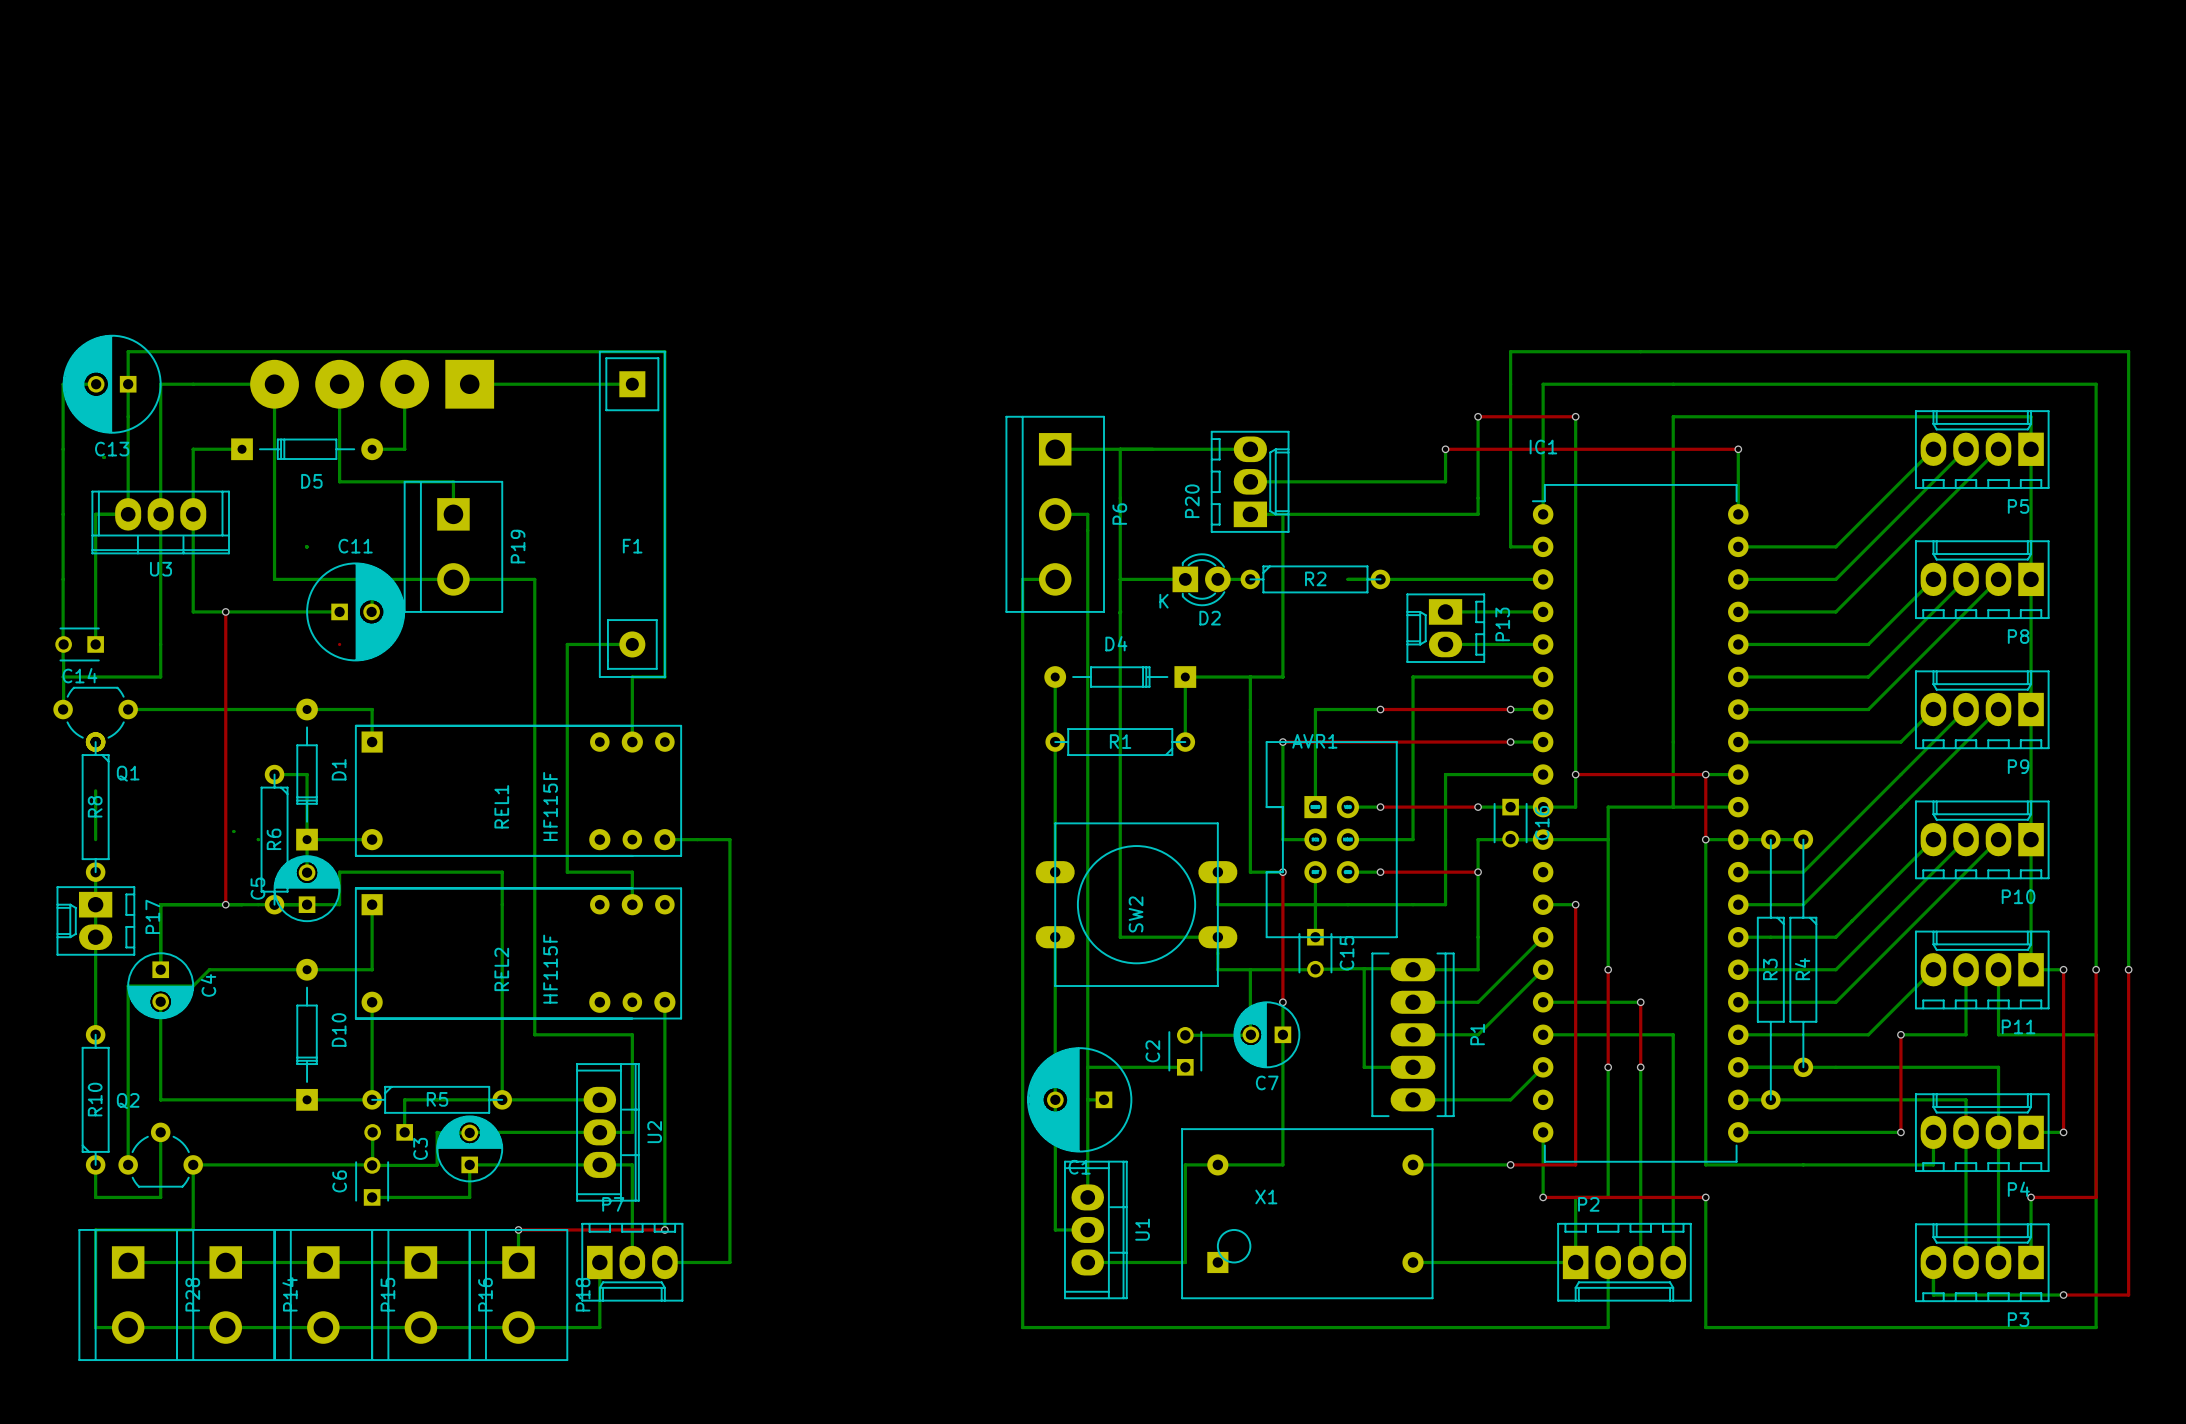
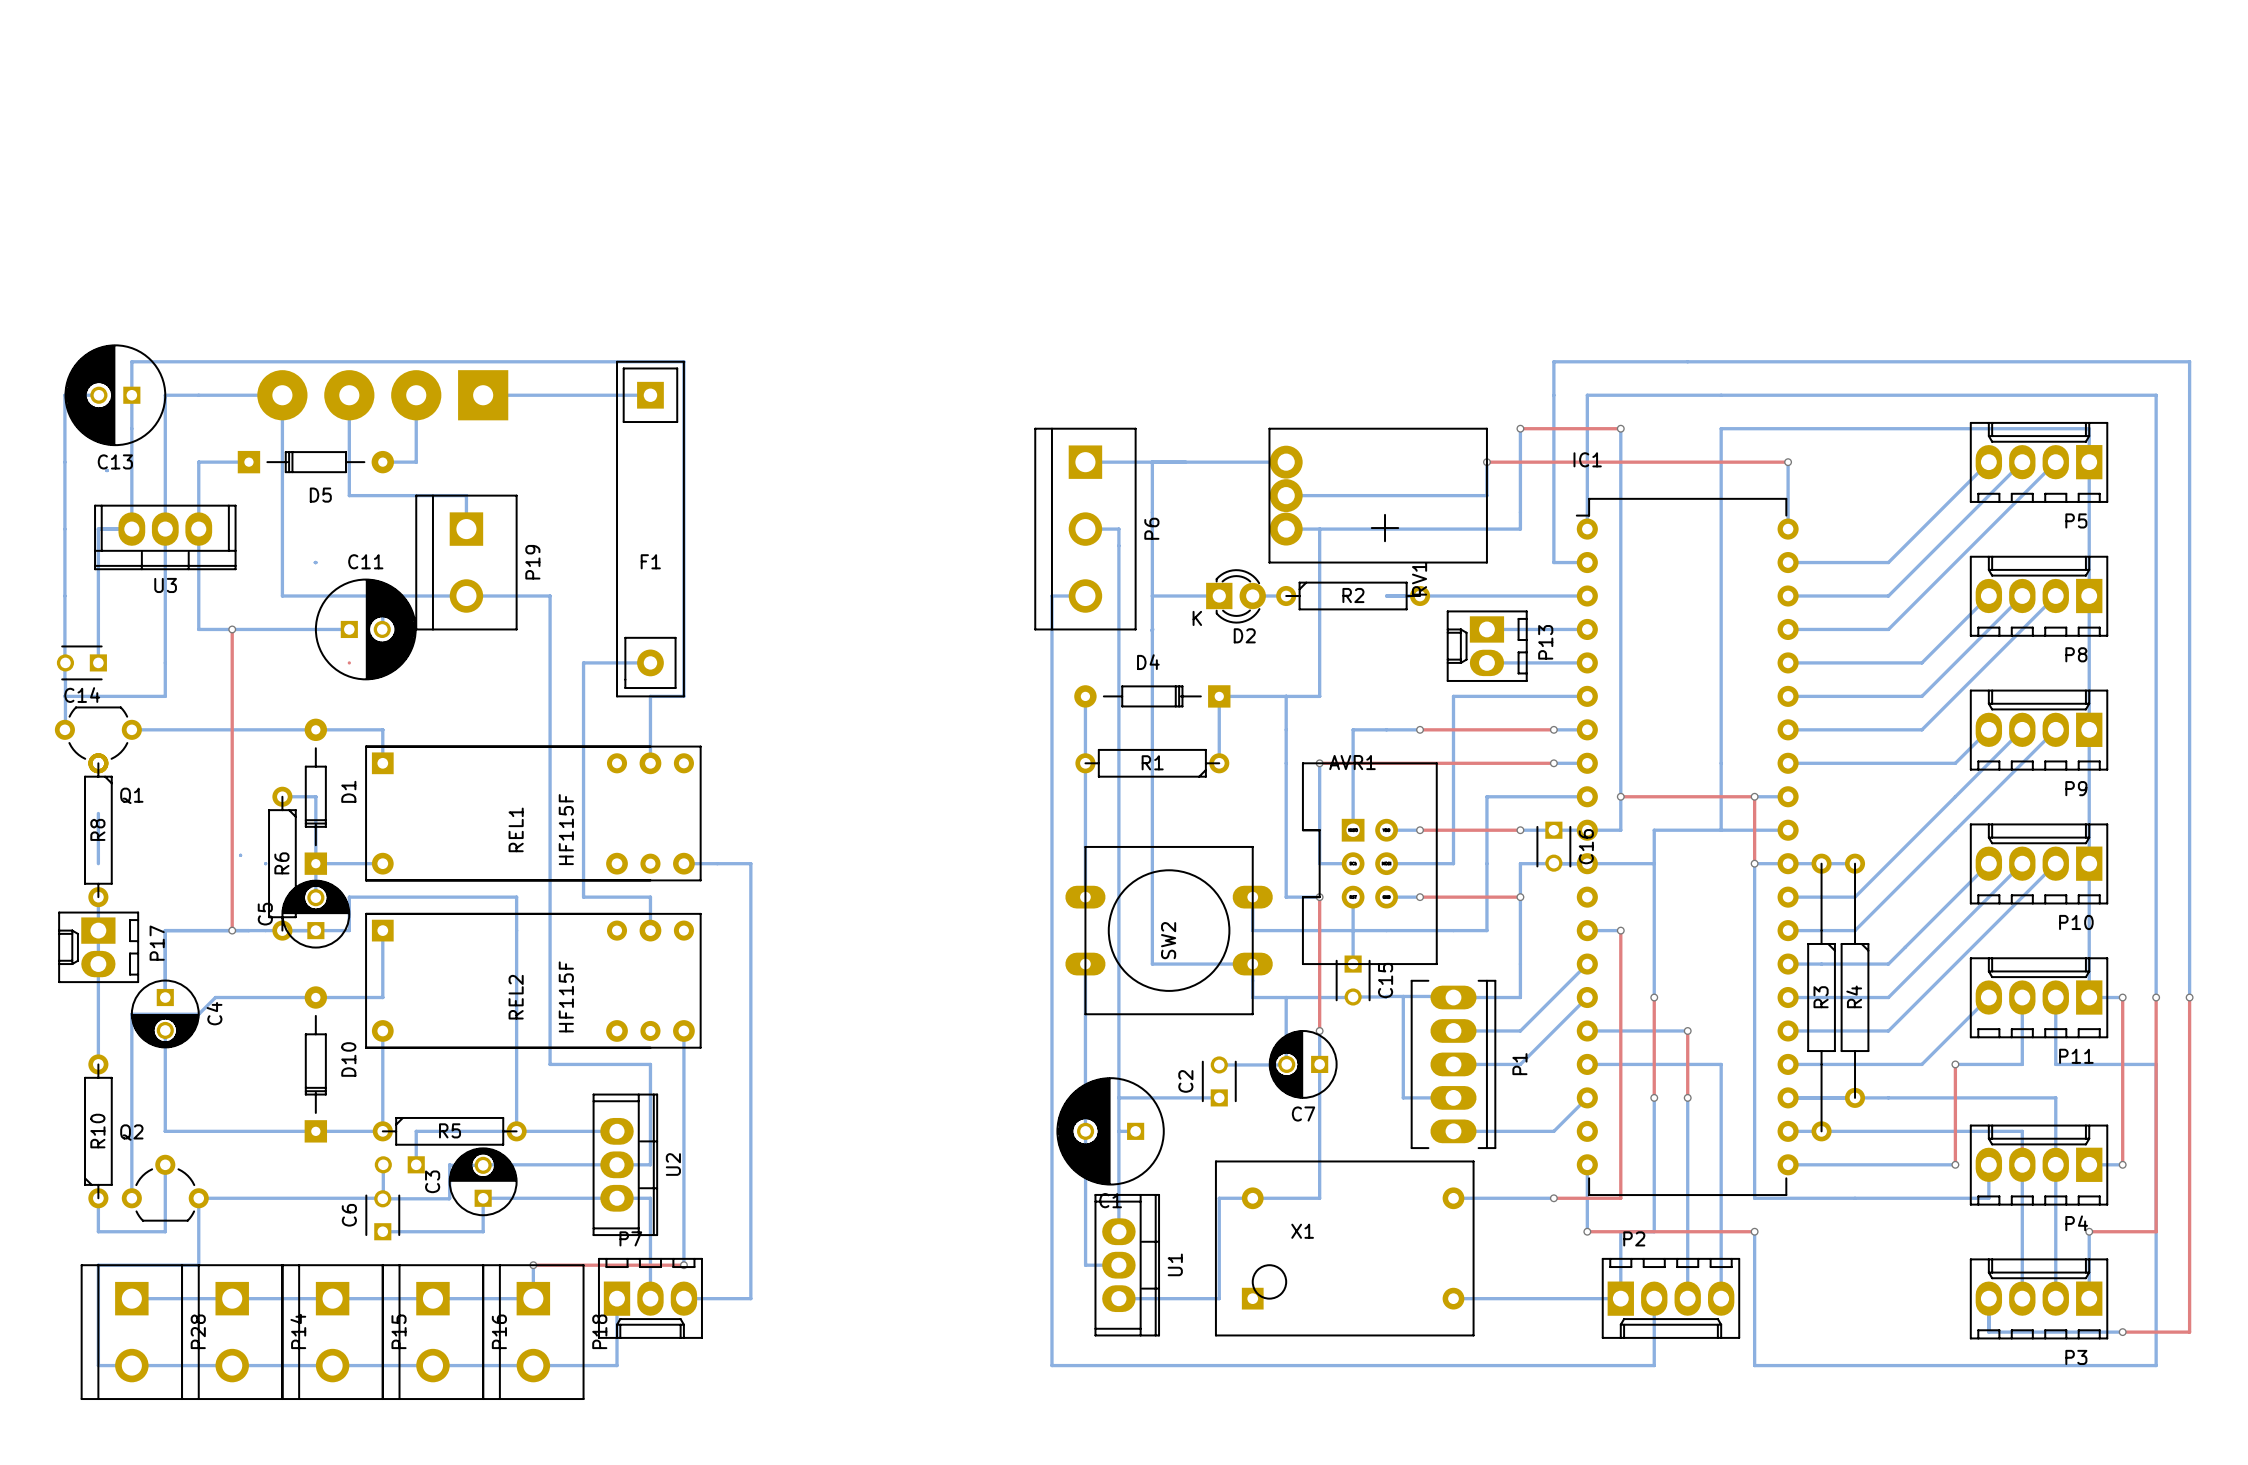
P20: (1250, 481) -> none
RV1: none -> (1378, 495)

